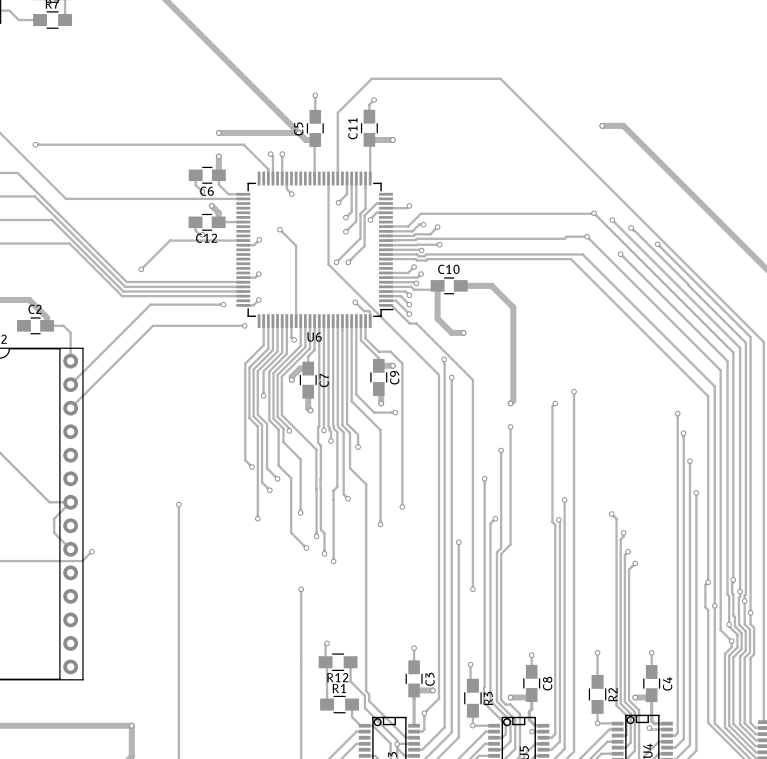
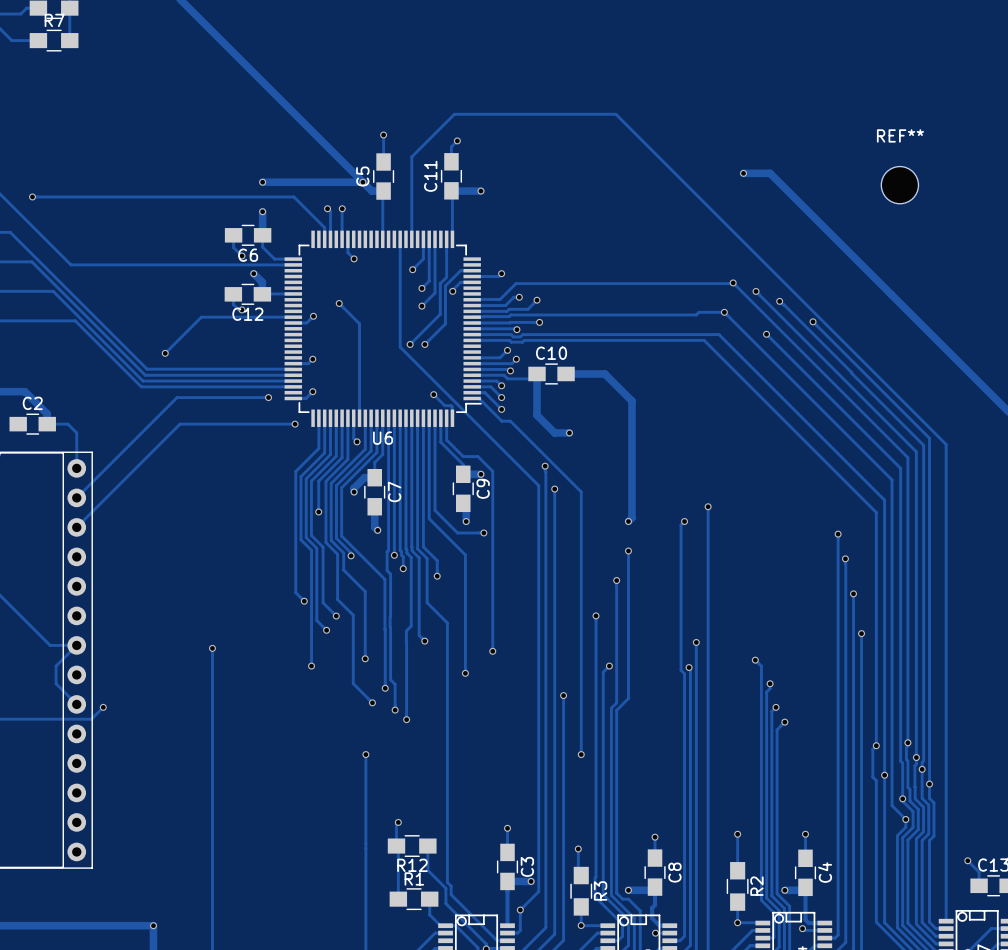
REF**: none -> (899, 185)

